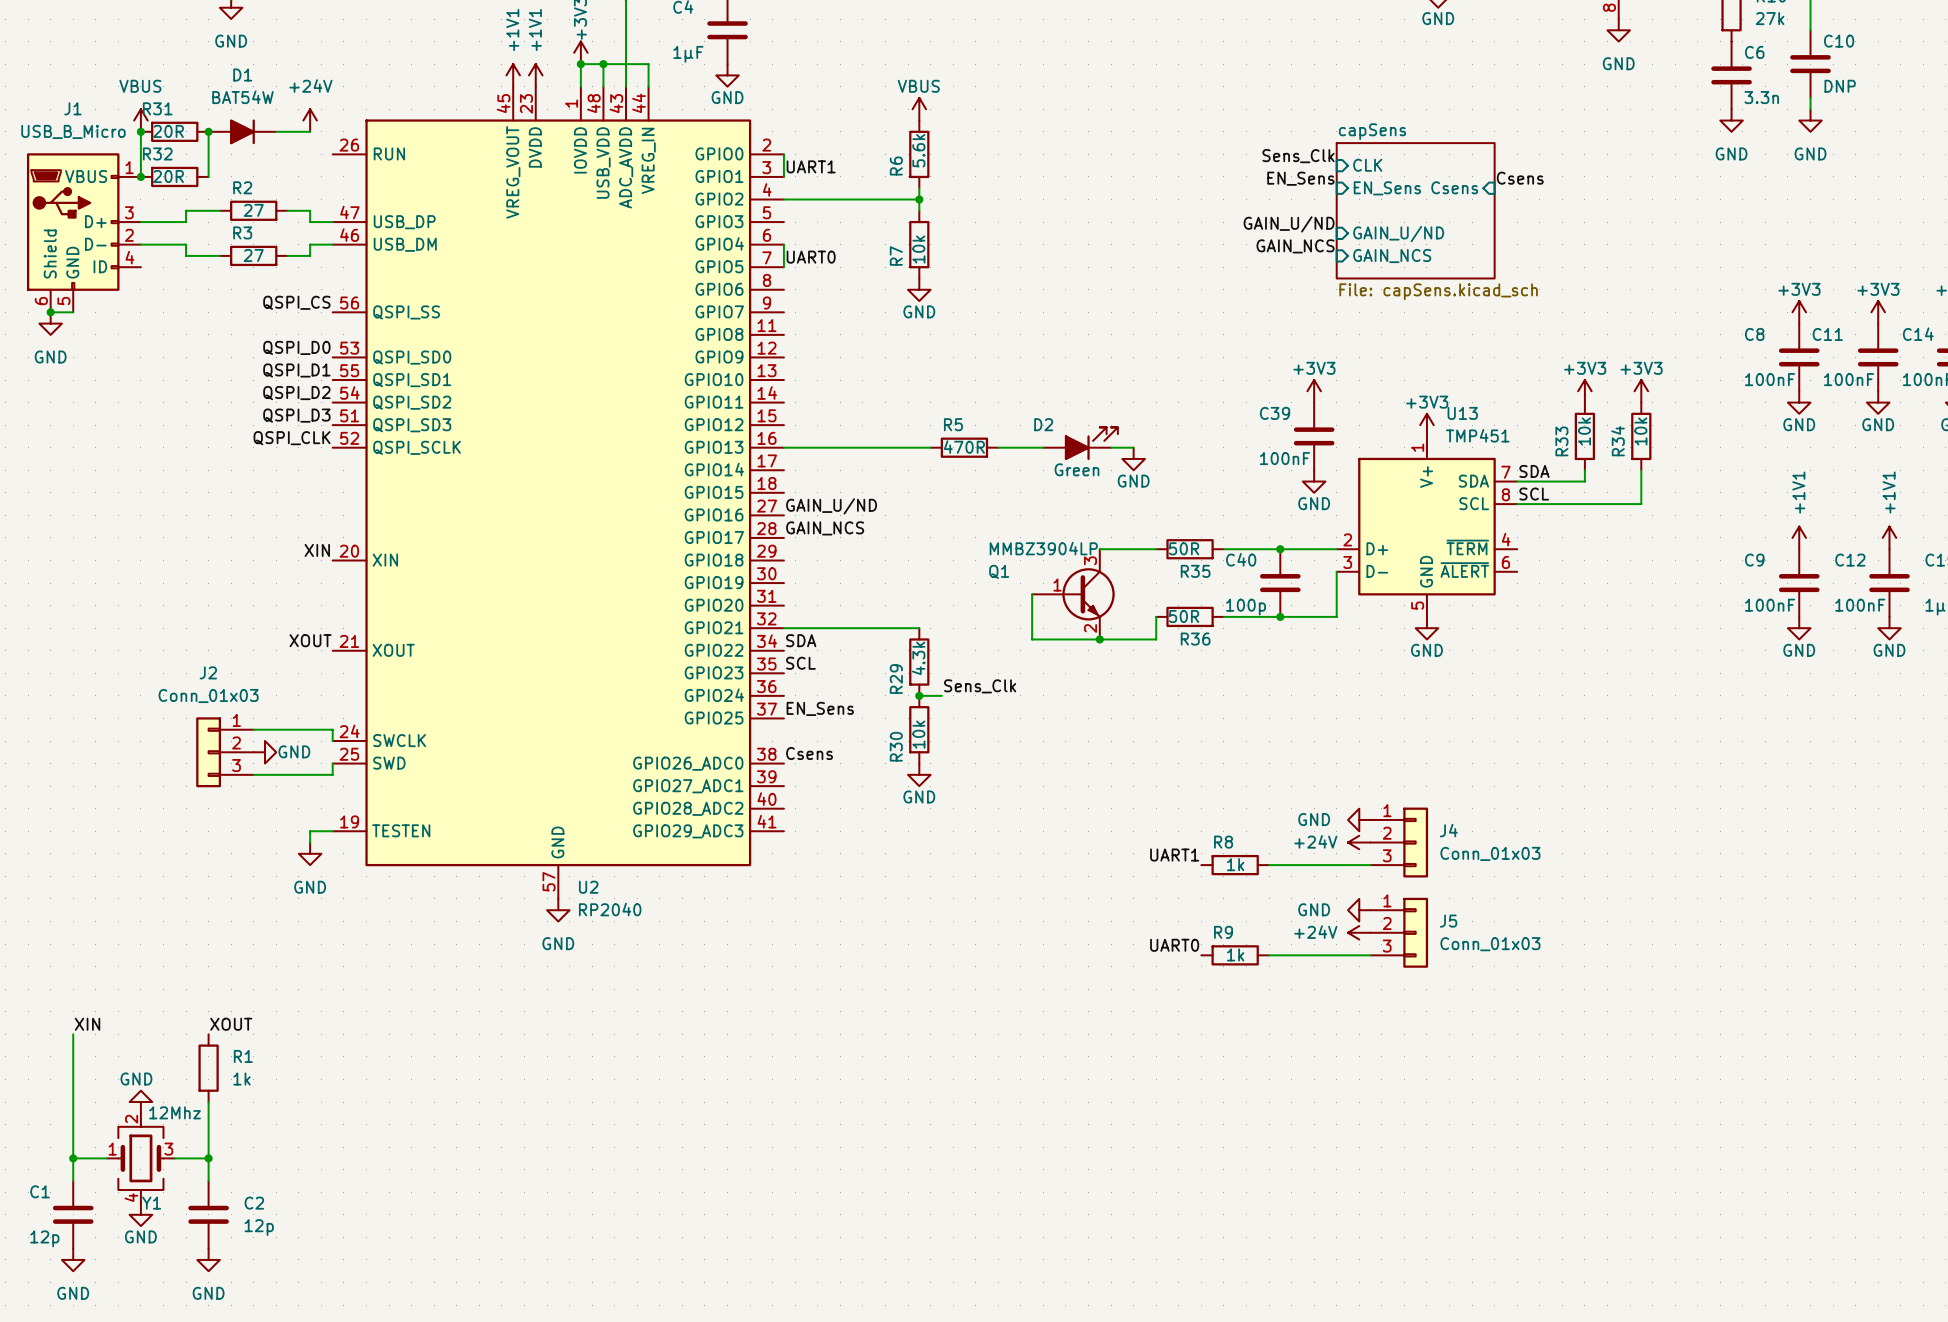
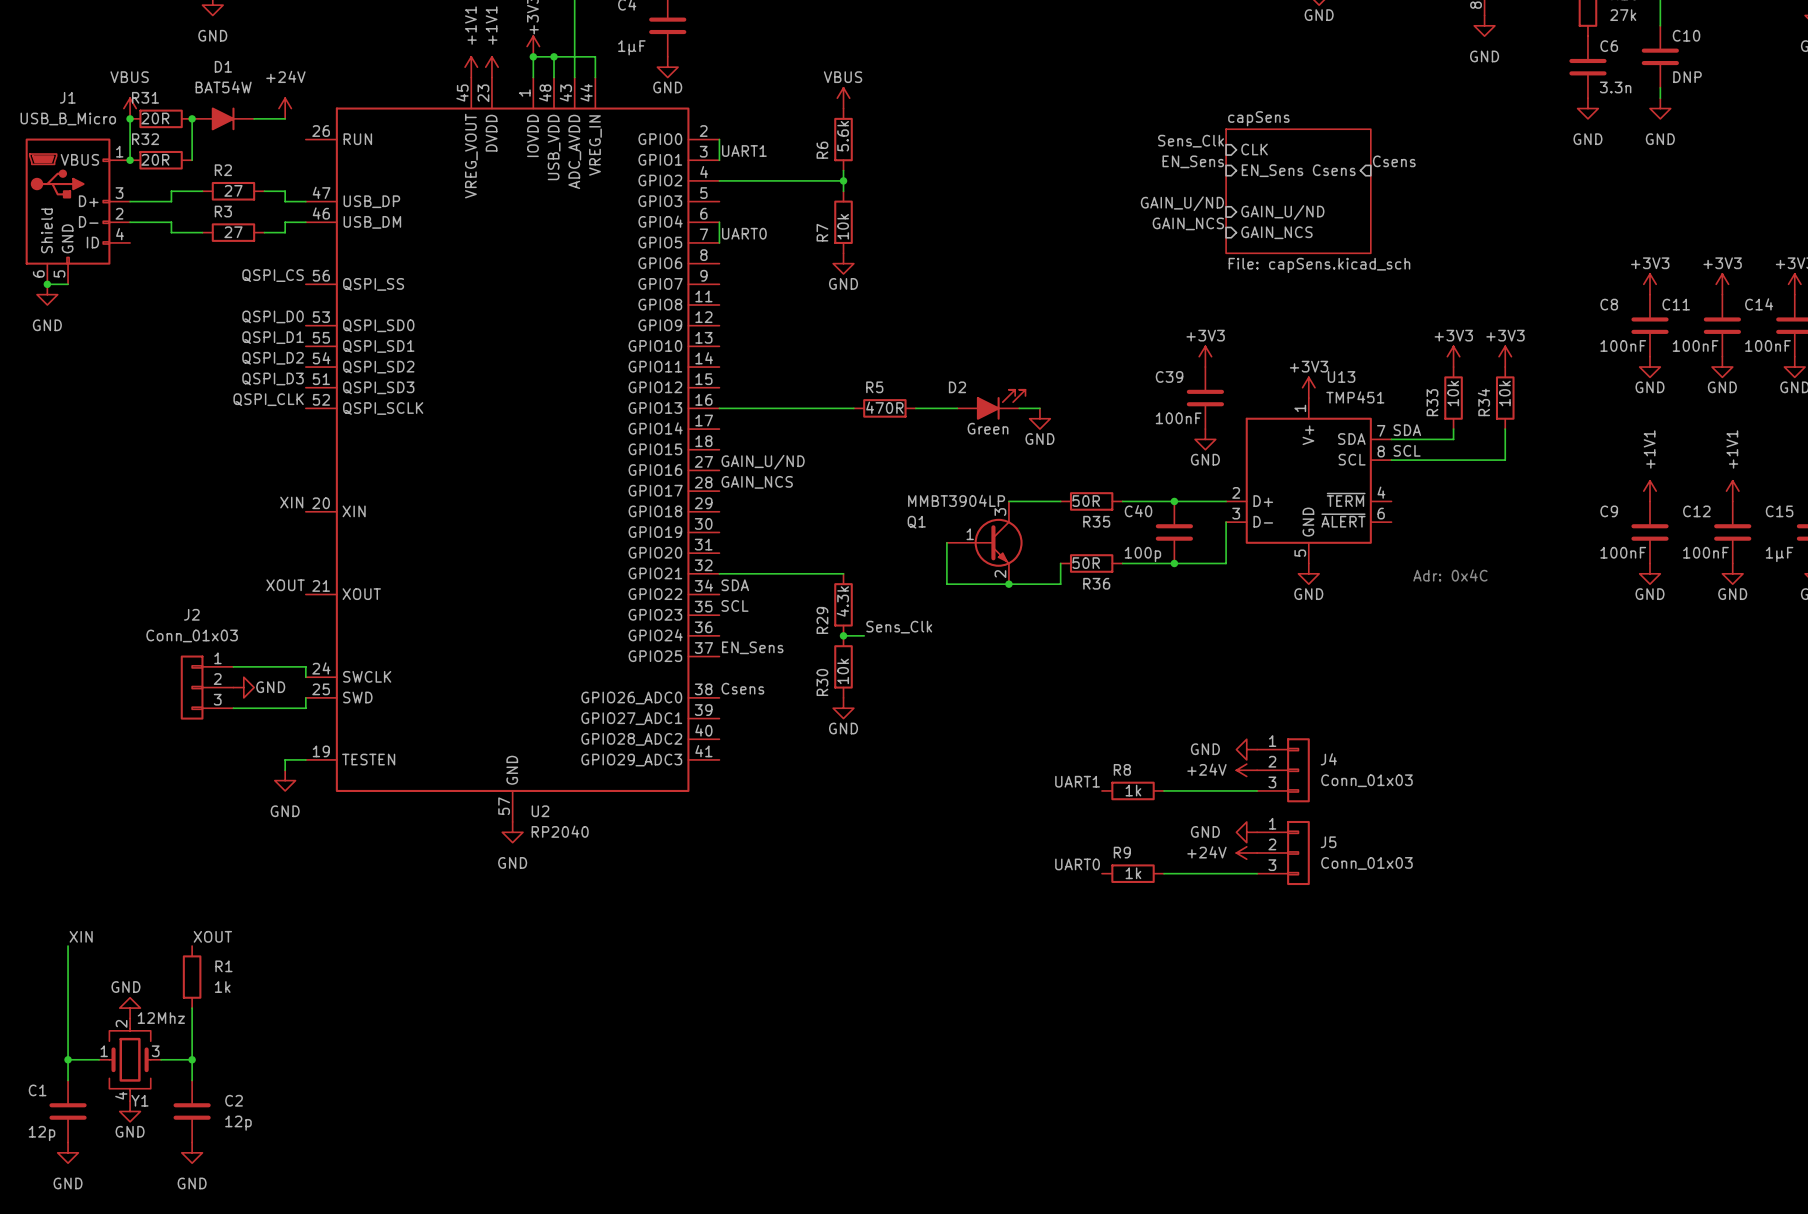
Q1 value: MMBZ3904LP (1043, 548) -> MMBT3904LP (956, 500)
text: none -> Adr: 0x4C (1450, 575)

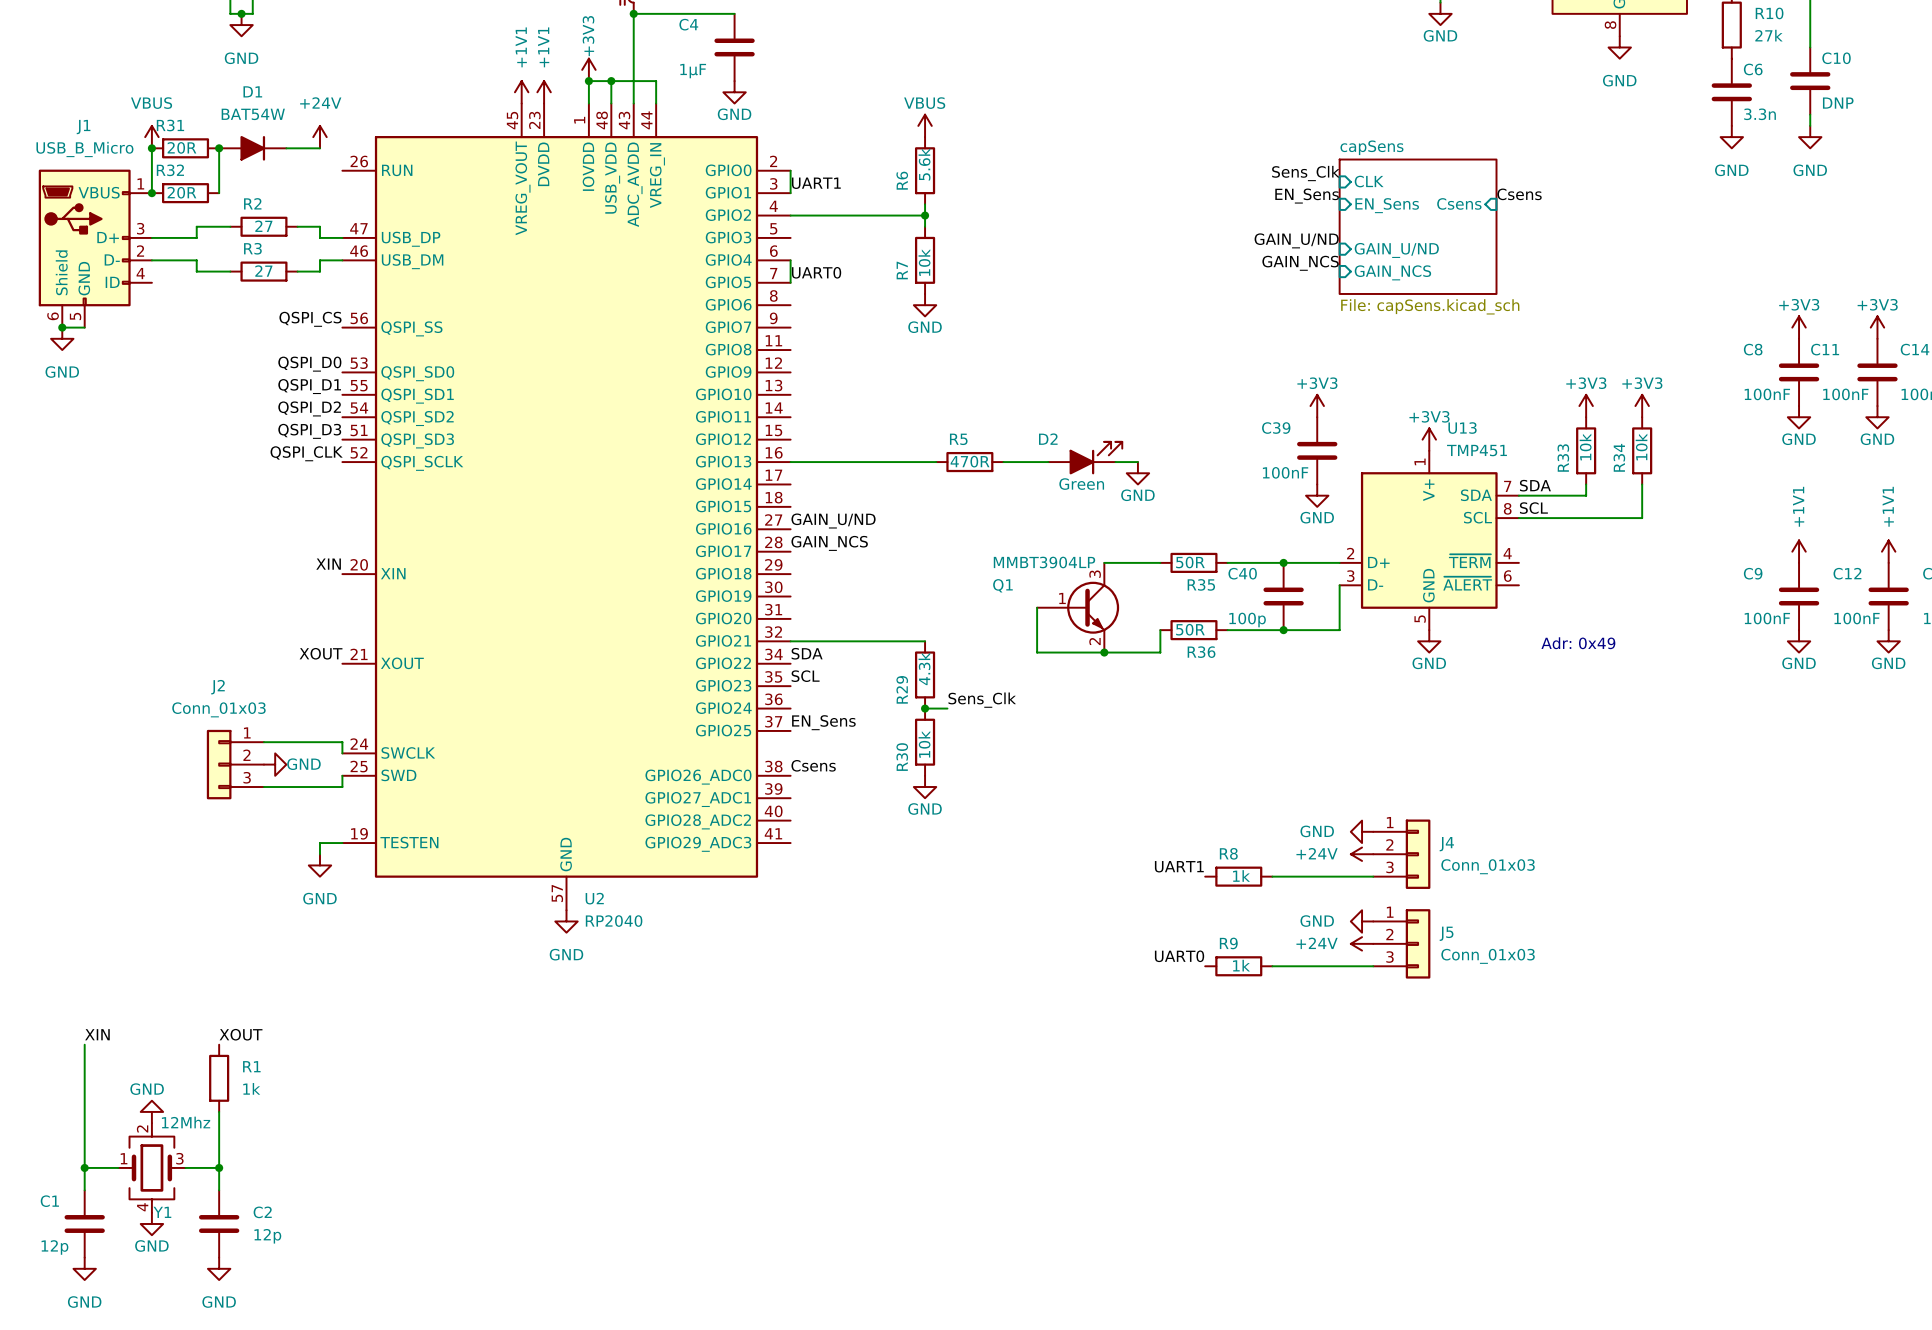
text: Adr: 0x4C (1450, 575) -> Adr: 0x49 (1578, 643)

